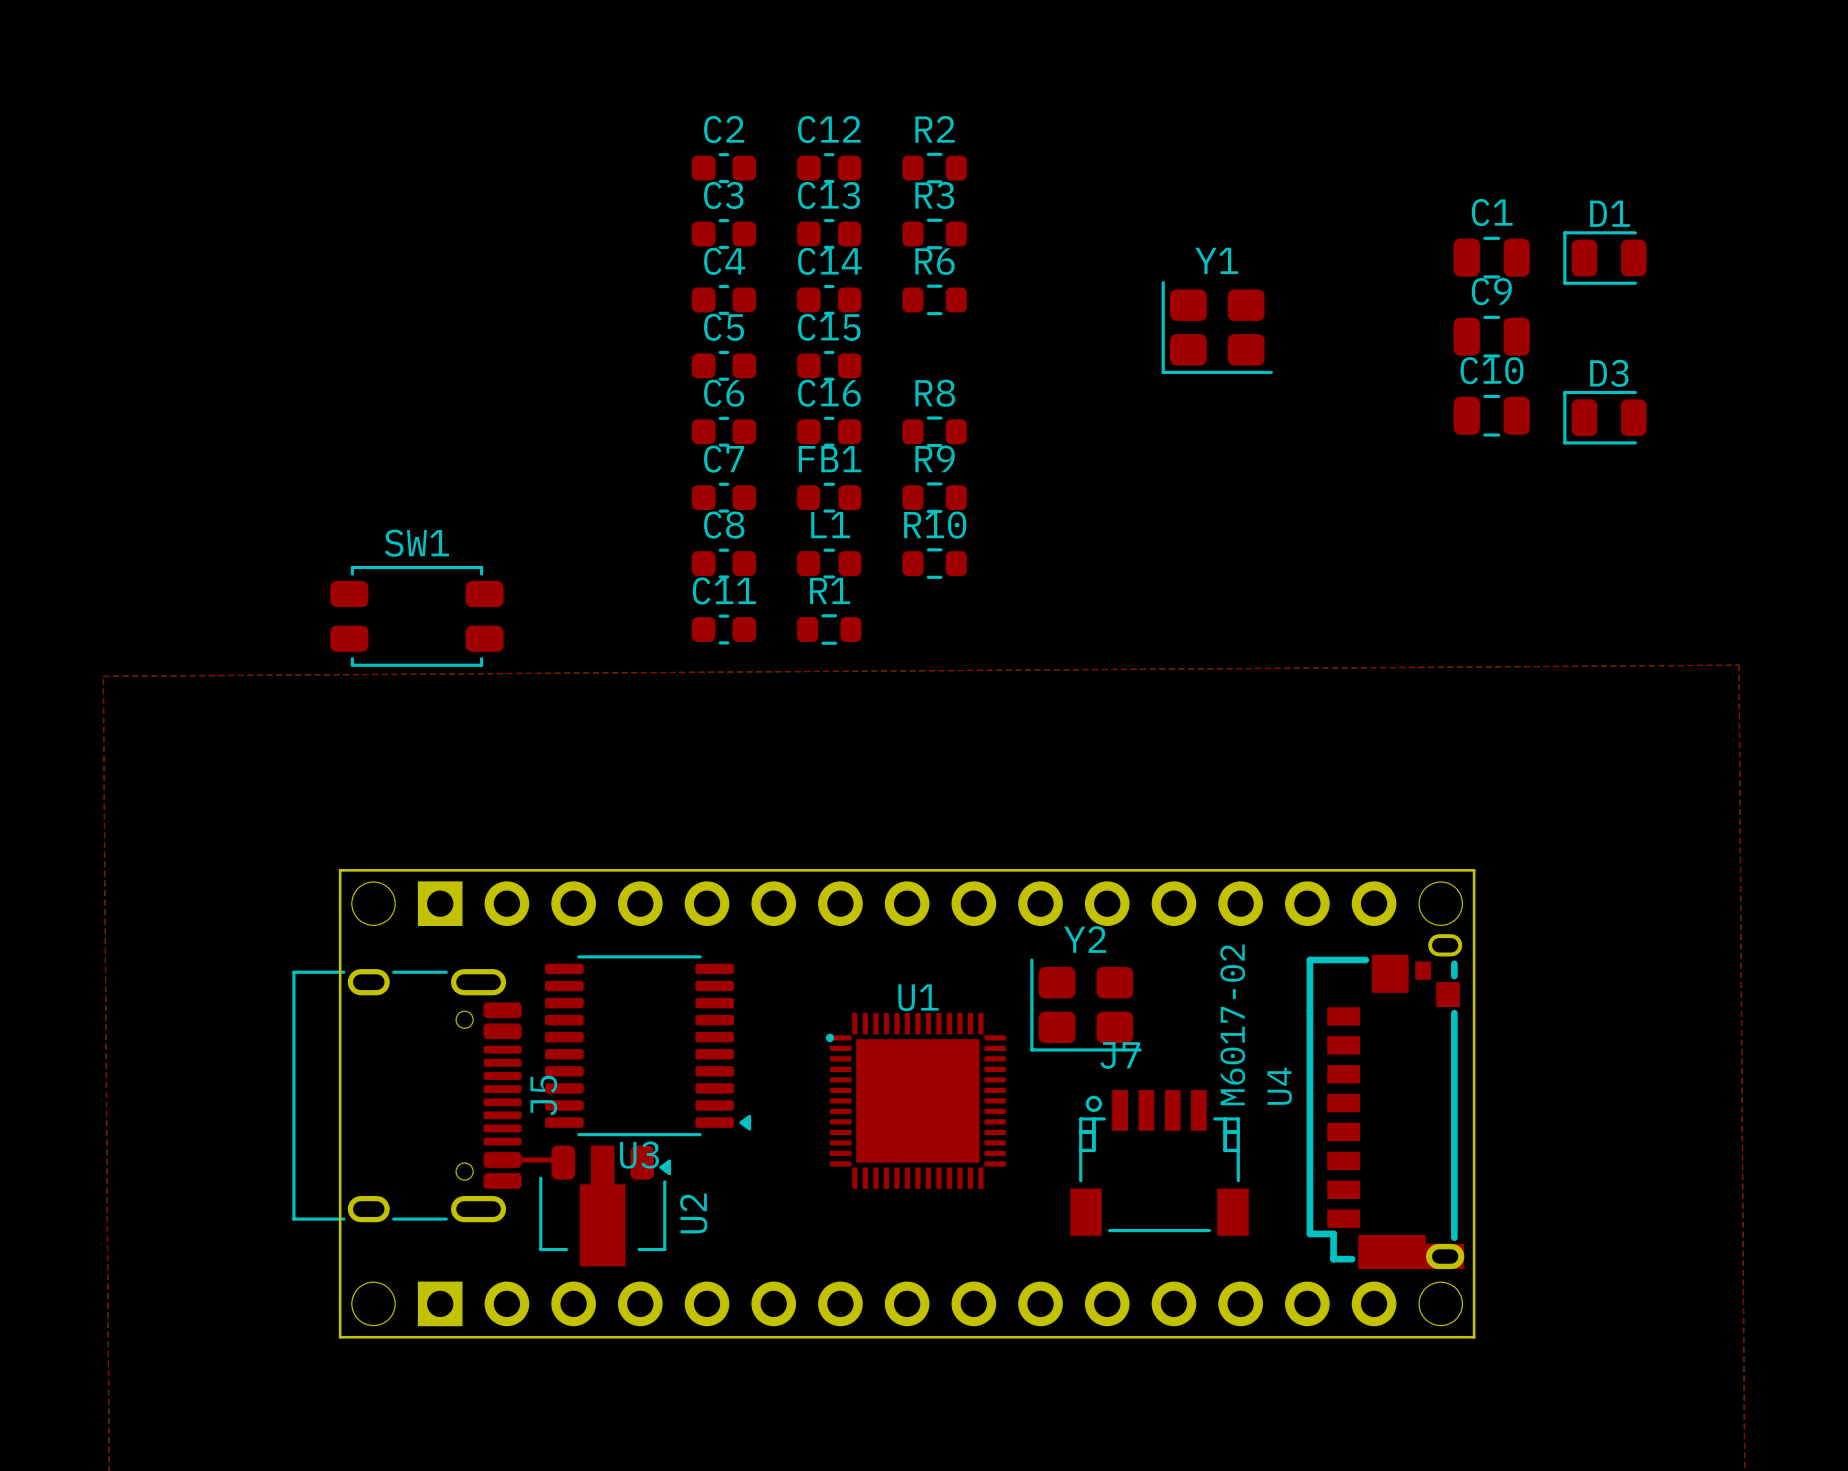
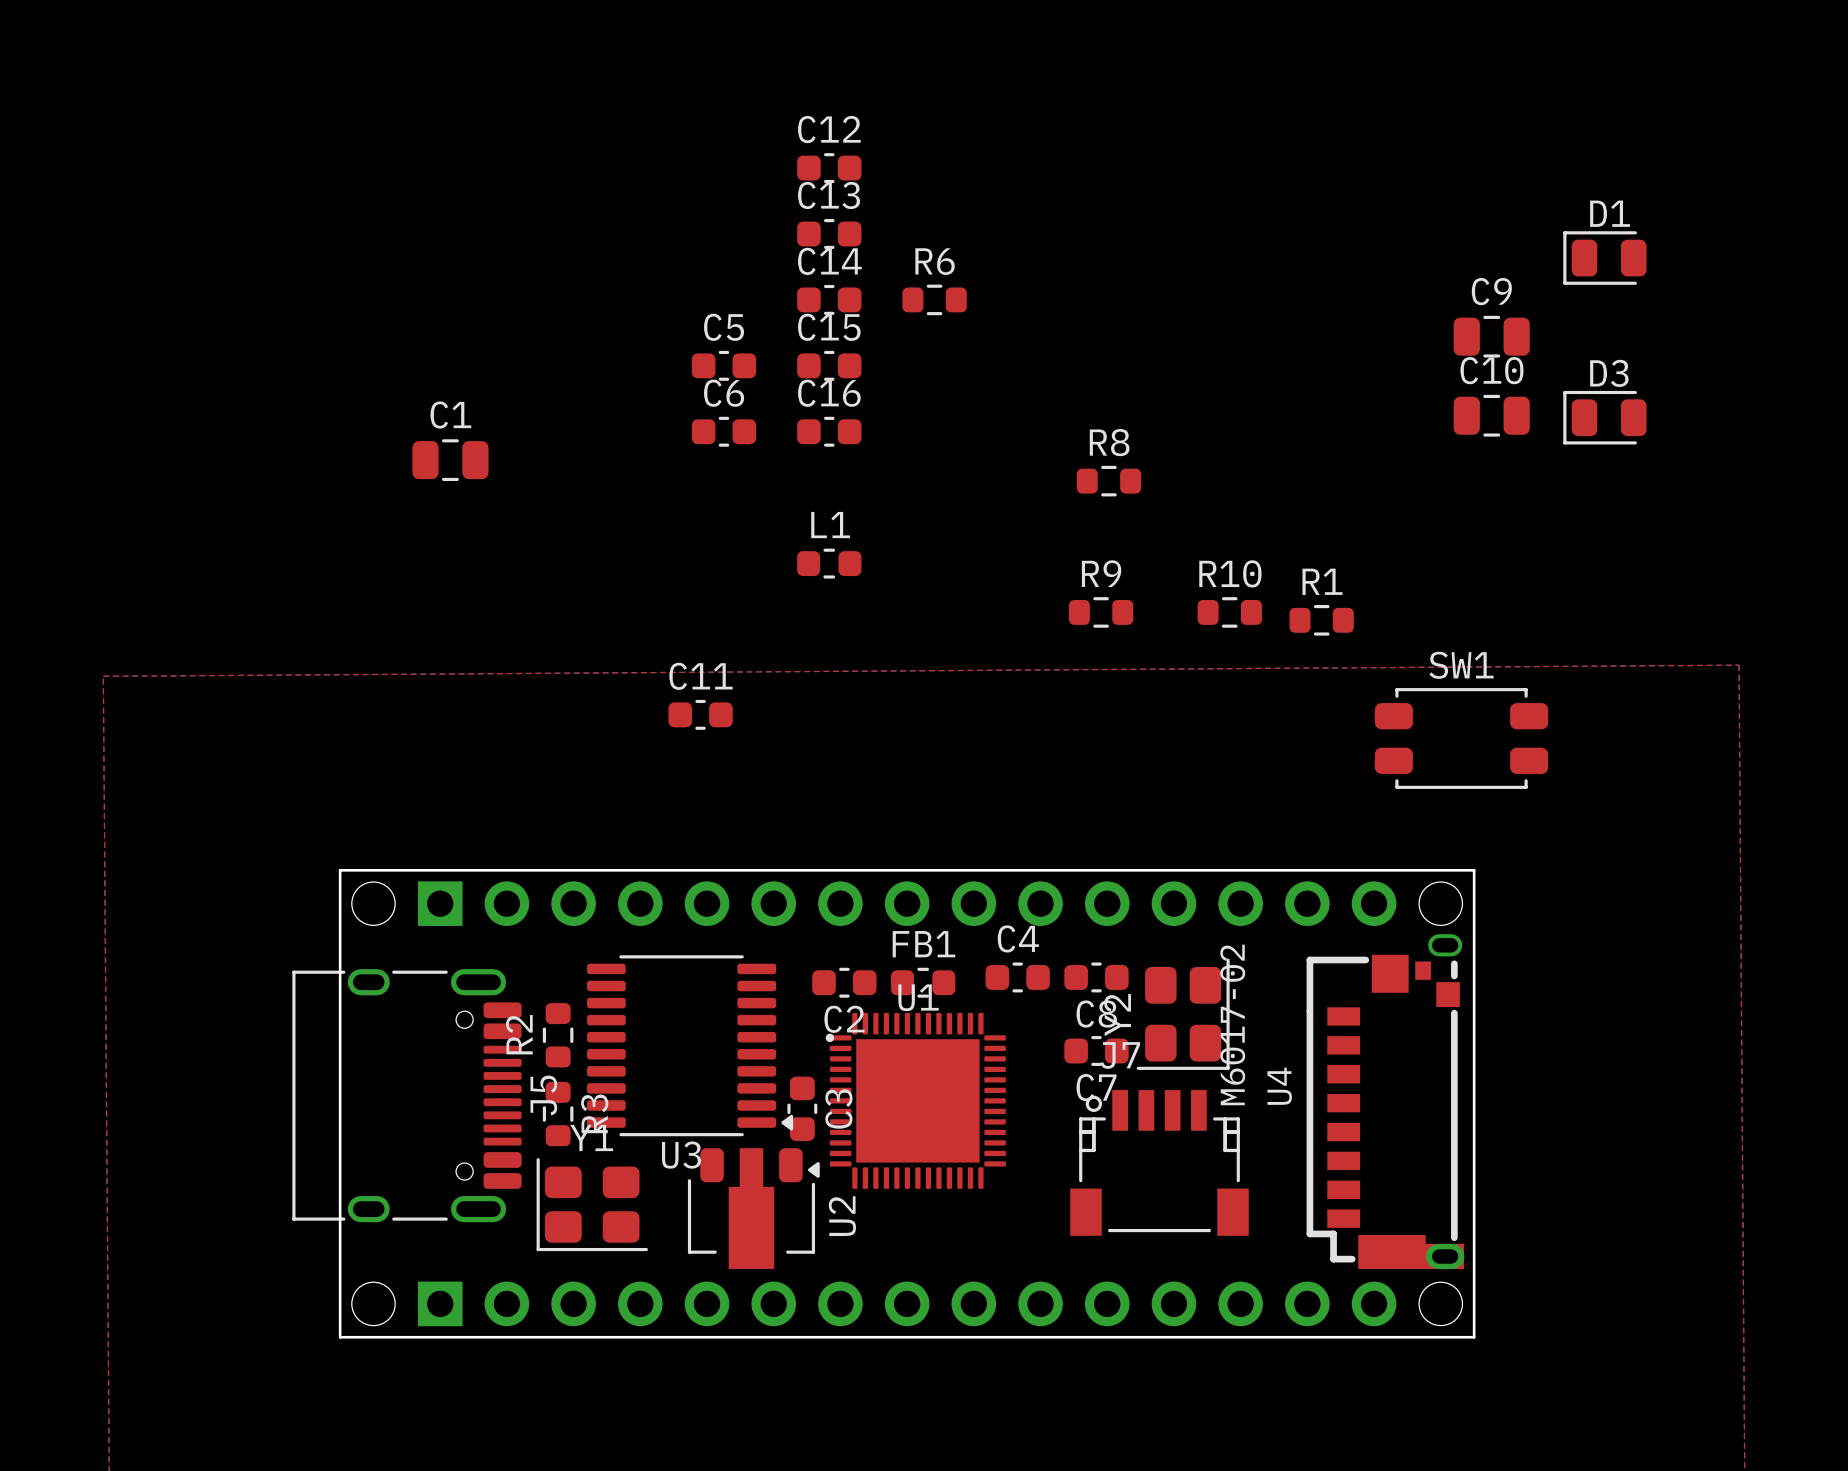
C2 name position: C2 (724, 129) -> C2 (844, 1019)
R2 name position: R2 (935, 129) -> R2 (519, 1034)
C2 position: (723, 168) -> (844, 982)
R2 rotation: 0° (934, 168) -> 90° clockwise (558, 1035)
R2 position: (934, 168) -> (558, 1035)
C3 rotation: 0° (723, 234) -> 90° clockwise (802, 1108)
C3 position: (723, 234) -> (802, 1108)
R3 rotation: 0° (934, 234) -> 90° clockwise (558, 1114)
R3 position: (934, 234) -> (558, 1114)
C1 position: (1491, 257) -> (450, 460)
C4 position: (723, 299) -> (1017, 977)
Y1 position: (1217, 327) -> (592, 1204)
R8 position: (934, 431) -> (1108, 481)
C7 name position: C7 (723, 459) -> C7 (1096, 1087)
C7 position: (723, 497) -> (1096, 1051)
FB1 position: (829, 497) -> (923, 982)
R9 position: (934, 497) -> (1101, 612)
C8 name position: C8 (724, 525) -> C8 (1096, 1014)
C8 position: (723, 563) -> (1096, 977)
R10 position: (934, 563) -> (1229, 612)
SW1 position: (416, 616) -> (1461, 738)
C11 position: (723, 629) -> (700, 714)
R1 position: (829, 629) -> (1321, 620)
Y2 rotation: 0° (1085, 1005) -> 90° counterclockwise (1183, 1014)
Y2 position: (1085, 1005) -> (1183, 1014)
U3 position: (648, 1045) -> (690, 1045)
top track: (502, 1159) (560, 1159) (563, 1162) -> none
U2 position: (605, 1205) -> (753, 1208)

